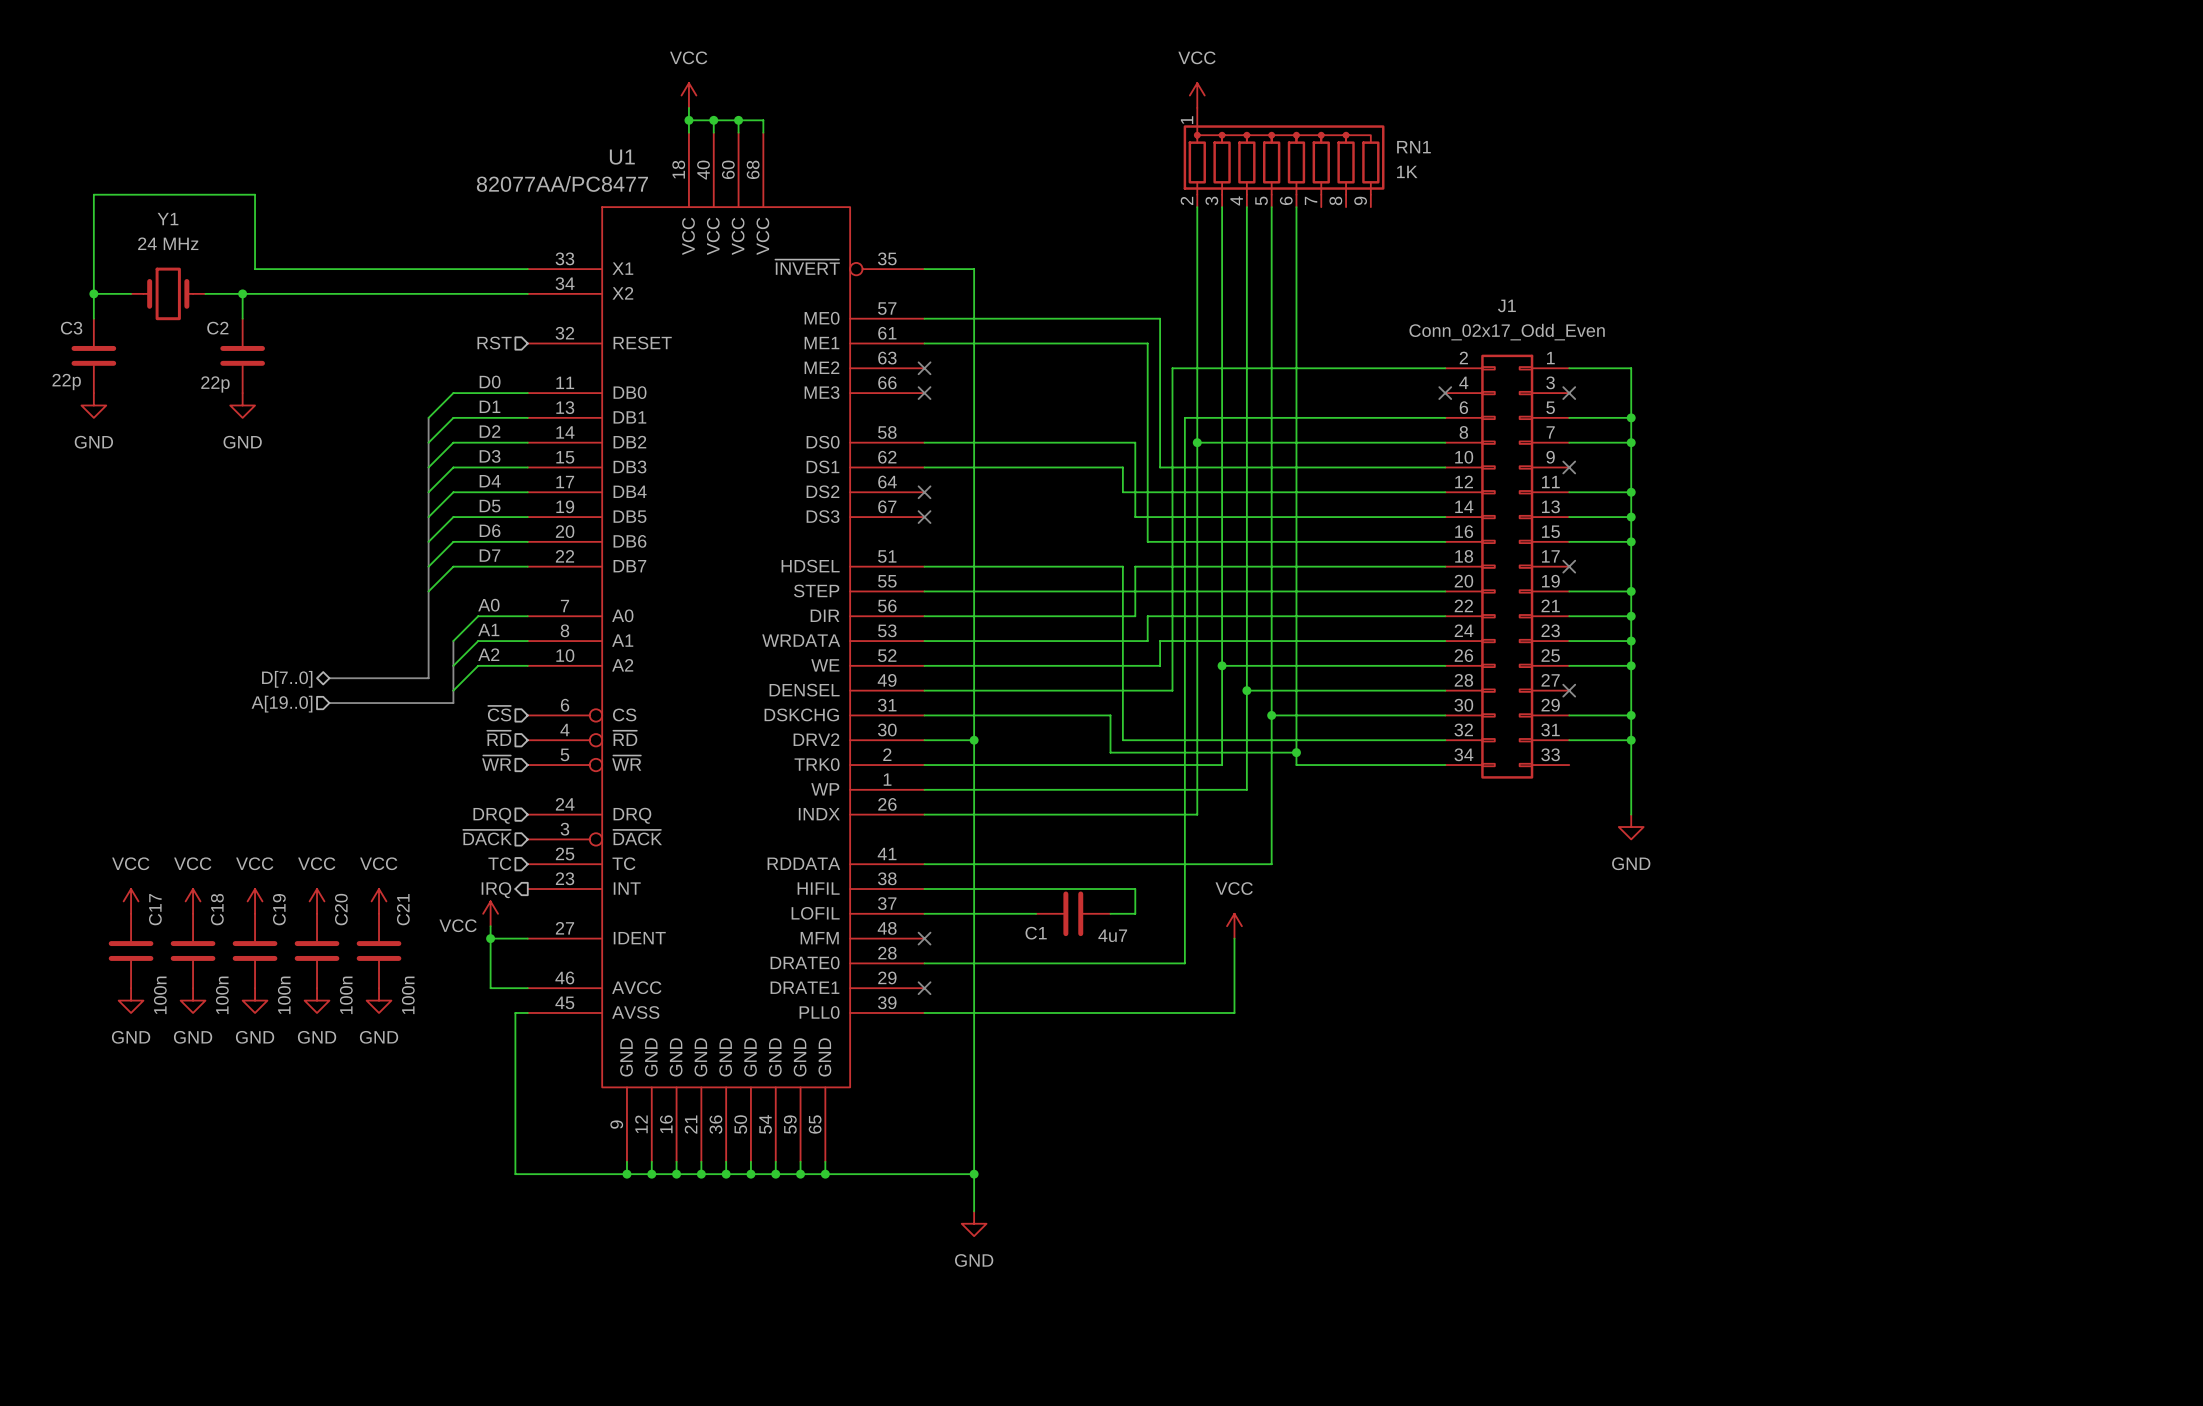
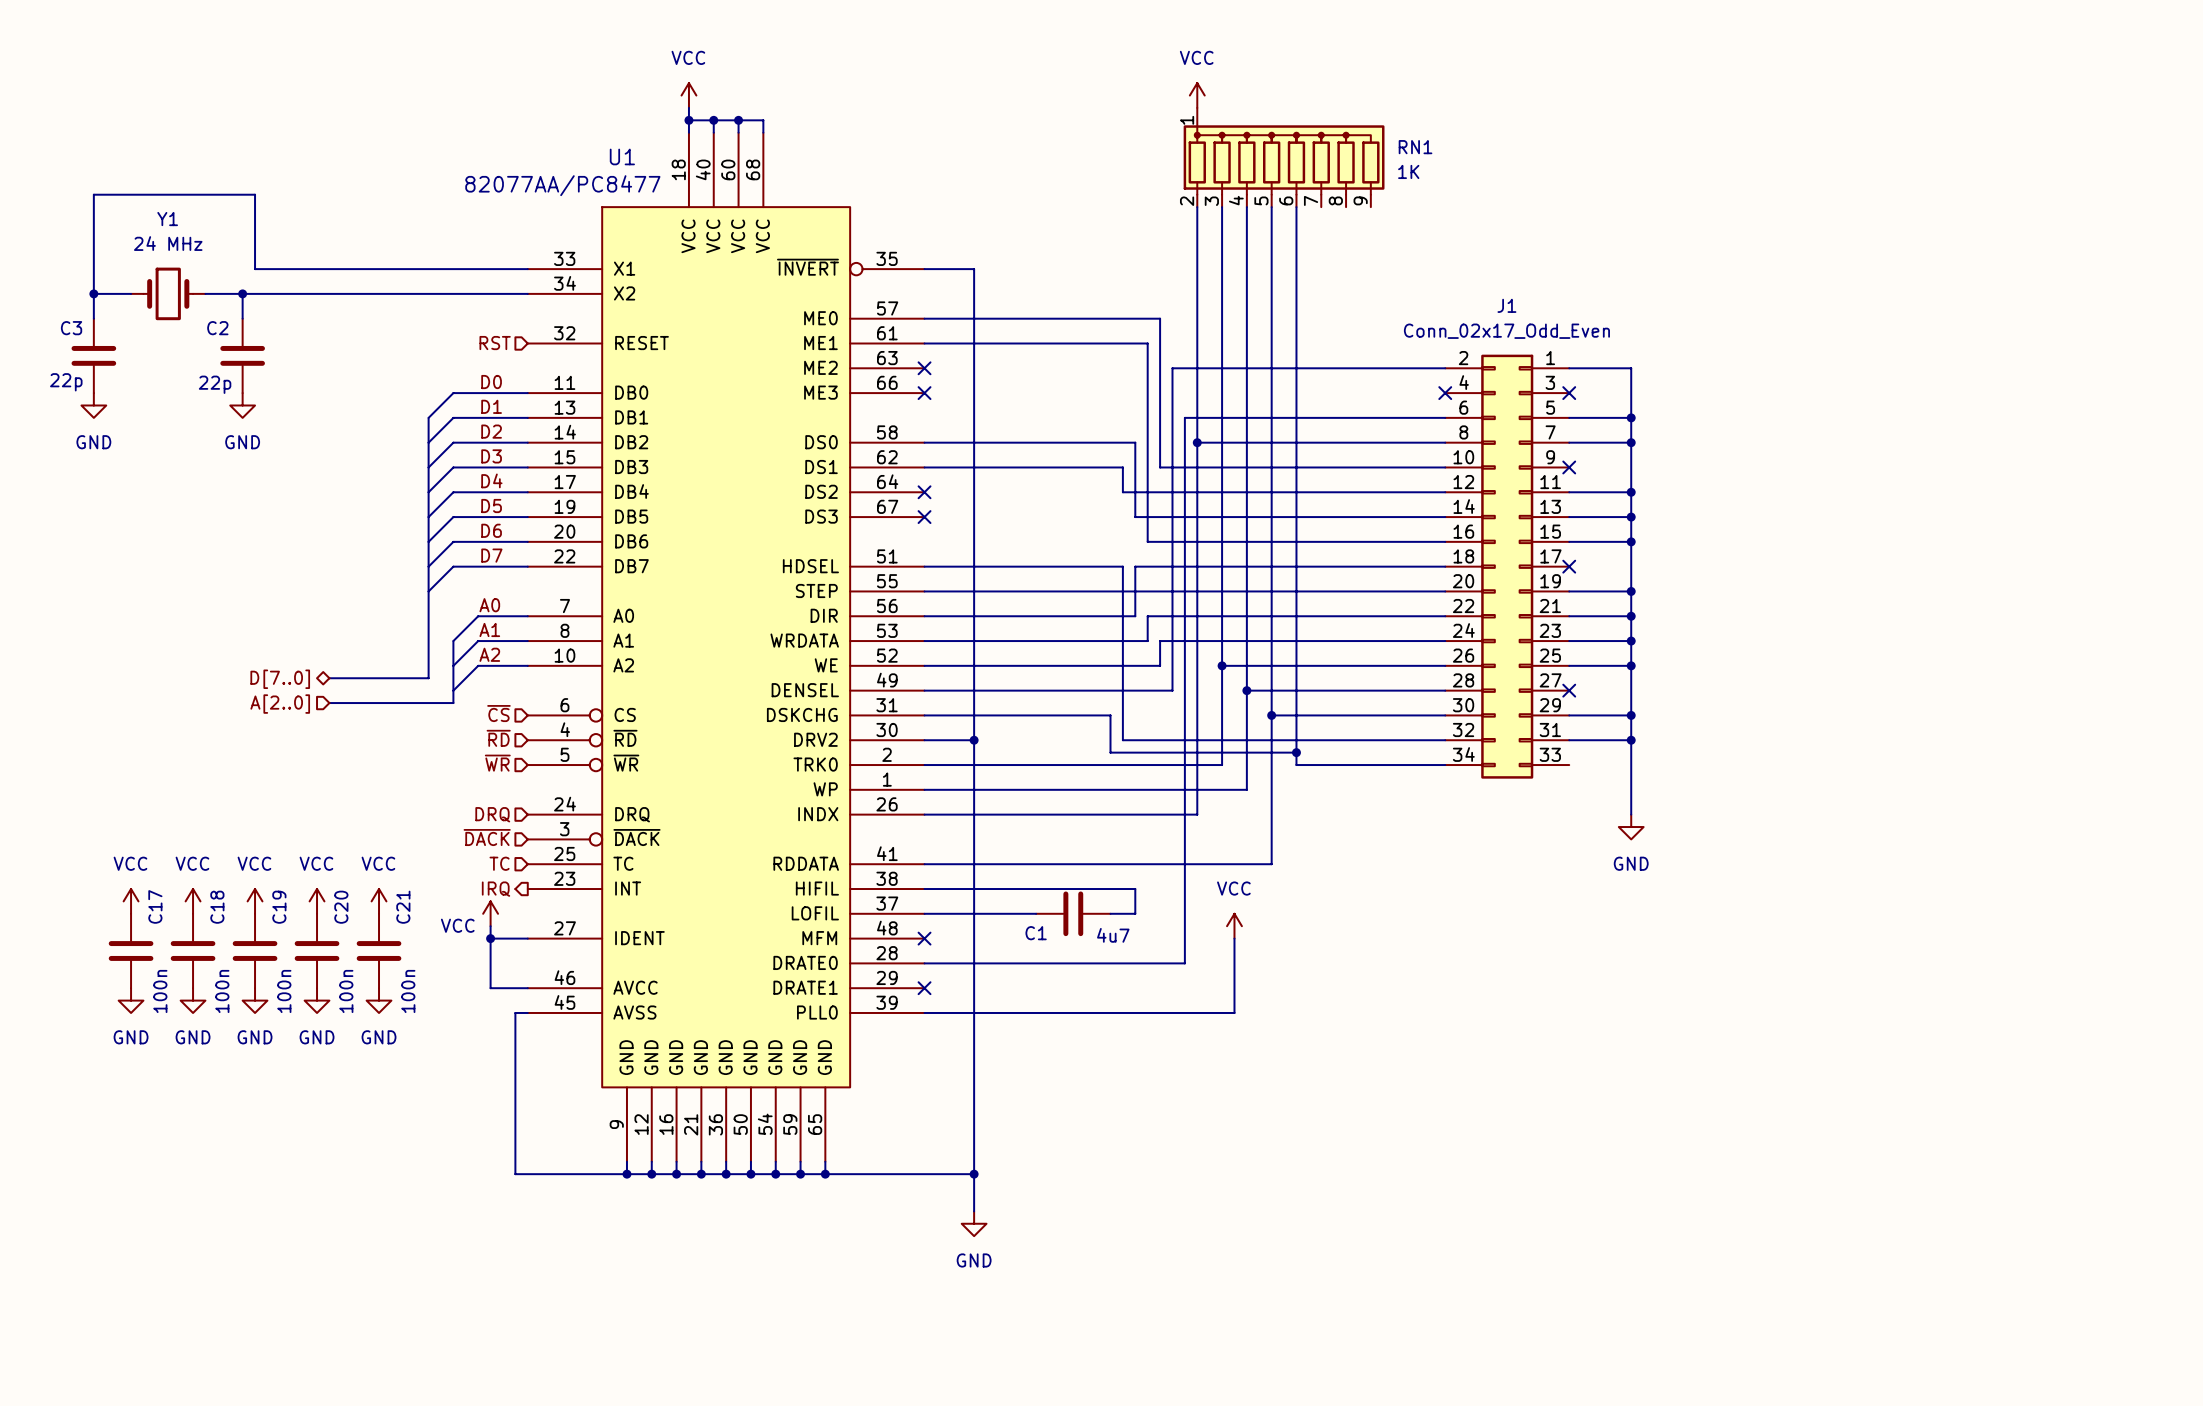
hierarchical label: A[19..0] (281, 704) -> A[2..0] (280, 704)

